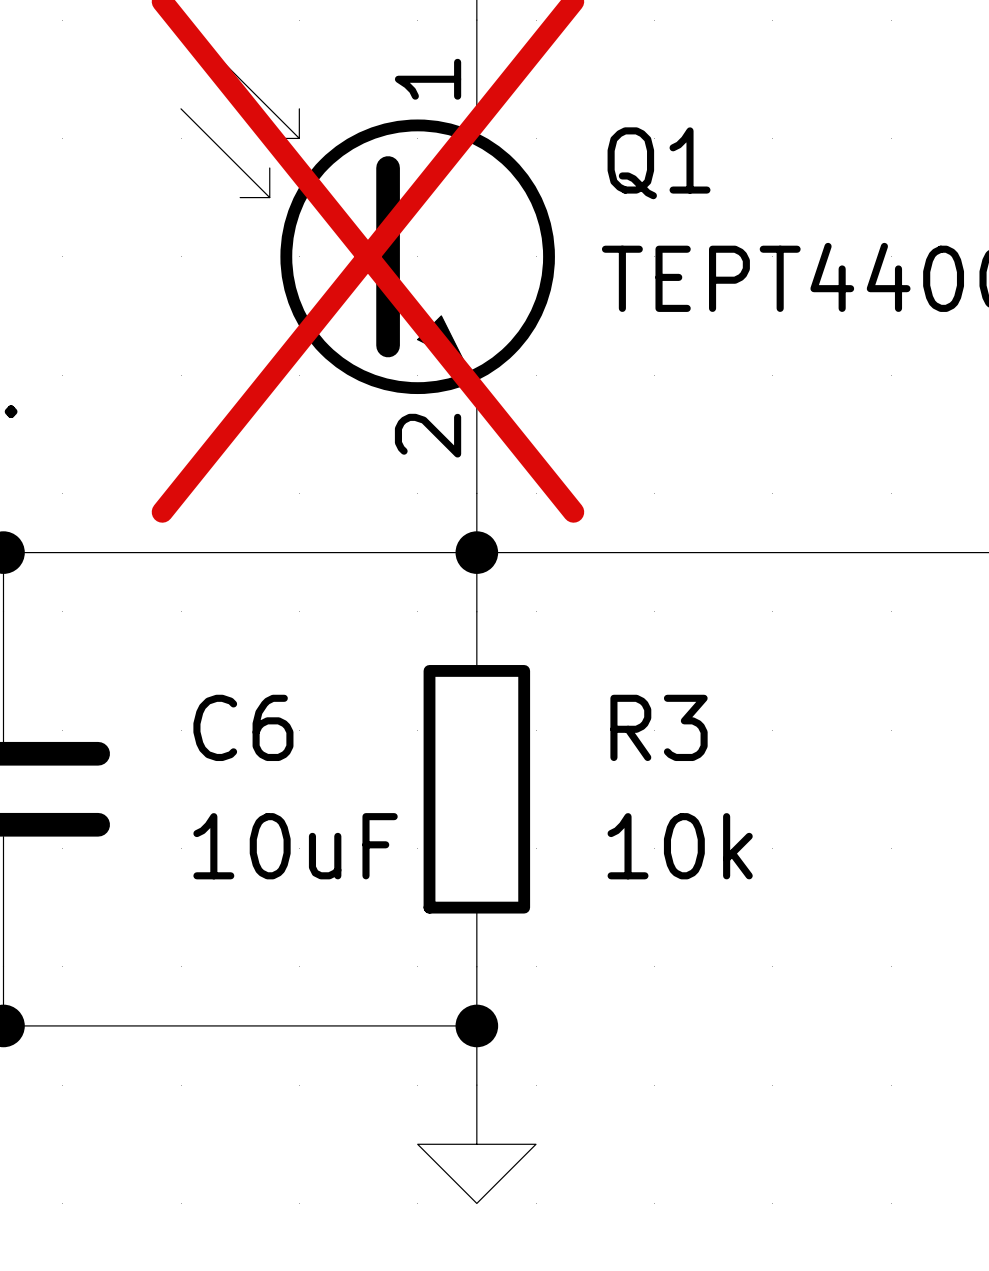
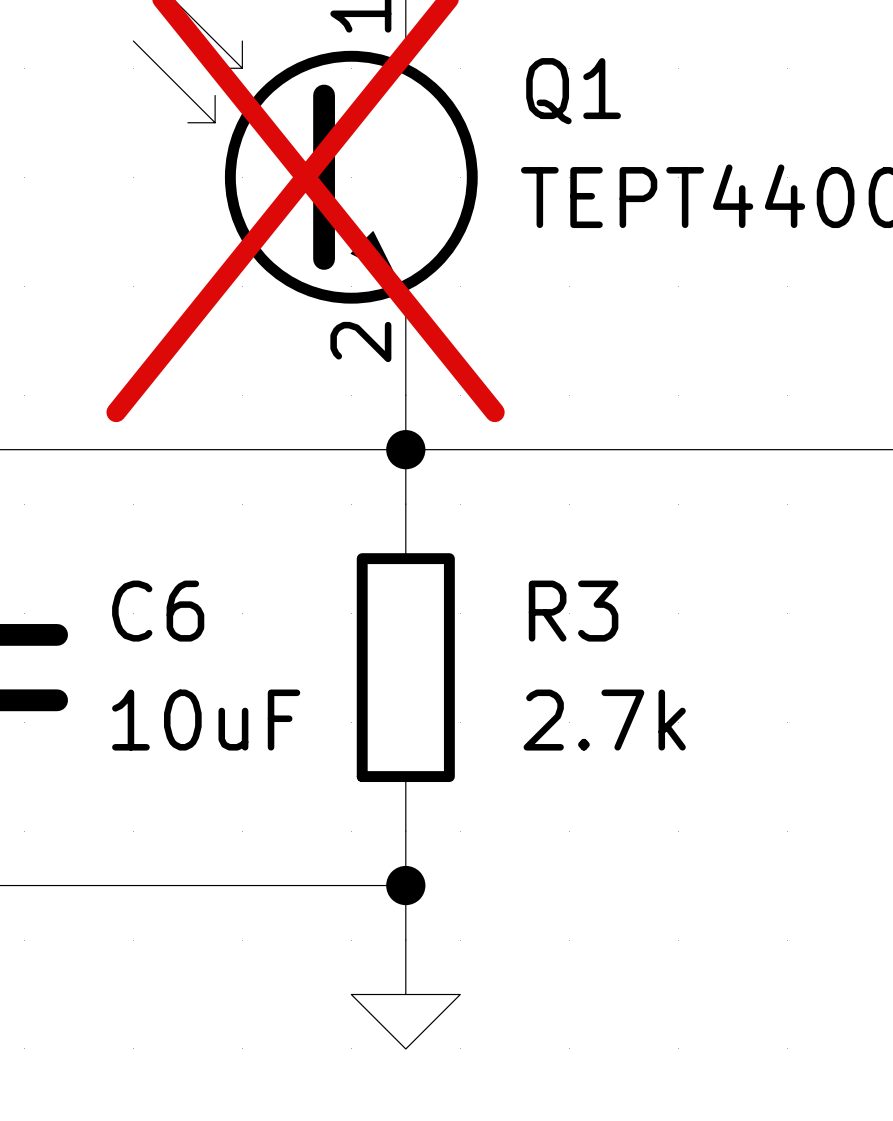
C6 name position: C6 (243, 727) -> C6 (158, 611)
C6 value position: 10uF (295, 846) -> 10uF (206, 720)
R3 value: 10k (680, 846) -> 2.7k (604, 720)

